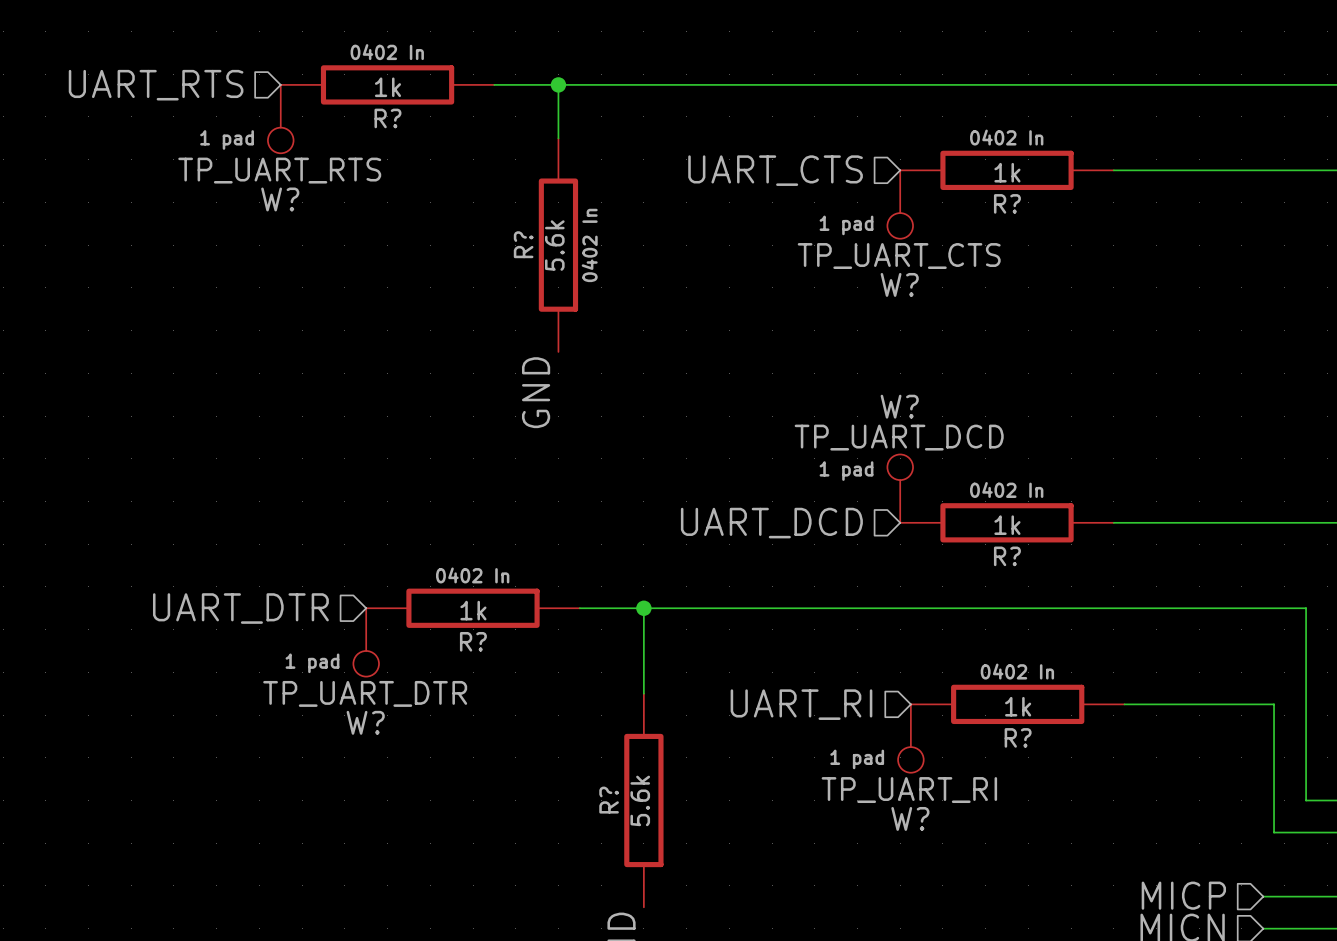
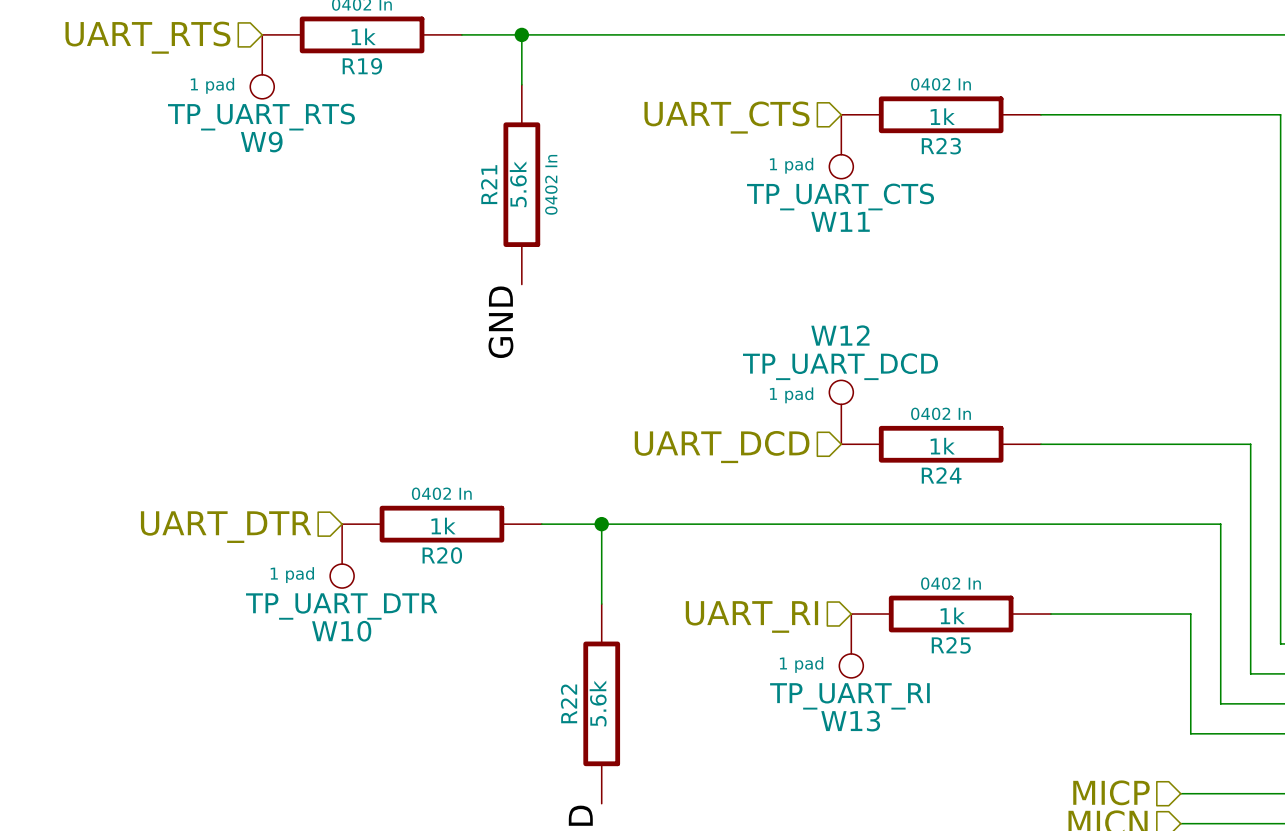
R? name: R? (387, 118) -> R19 (362, 66)
W? name: W? (280, 199) -> W9 (261, 142)
R? name: R? (1007, 203) -> R23 (941, 146)
R? name: R? (523, 244) -> R21 (489, 184)
W? name: W? (899, 284) -> W11 (840, 221)
W? name: W? (899, 406) -> W12 (840, 335)
R? name: R? (1007, 556) -> R24 (941, 475)
R? name: R? (473, 641) -> R20 (442, 555)
W? name: W? (365, 722) -> W10 (341, 631)
R? name: R? (1018, 737) -> R25 (951, 645)
R? name: R? (609, 800) -> R22 (569, 703)
W? name: W? (910, 818) -> W13 (850, 721)

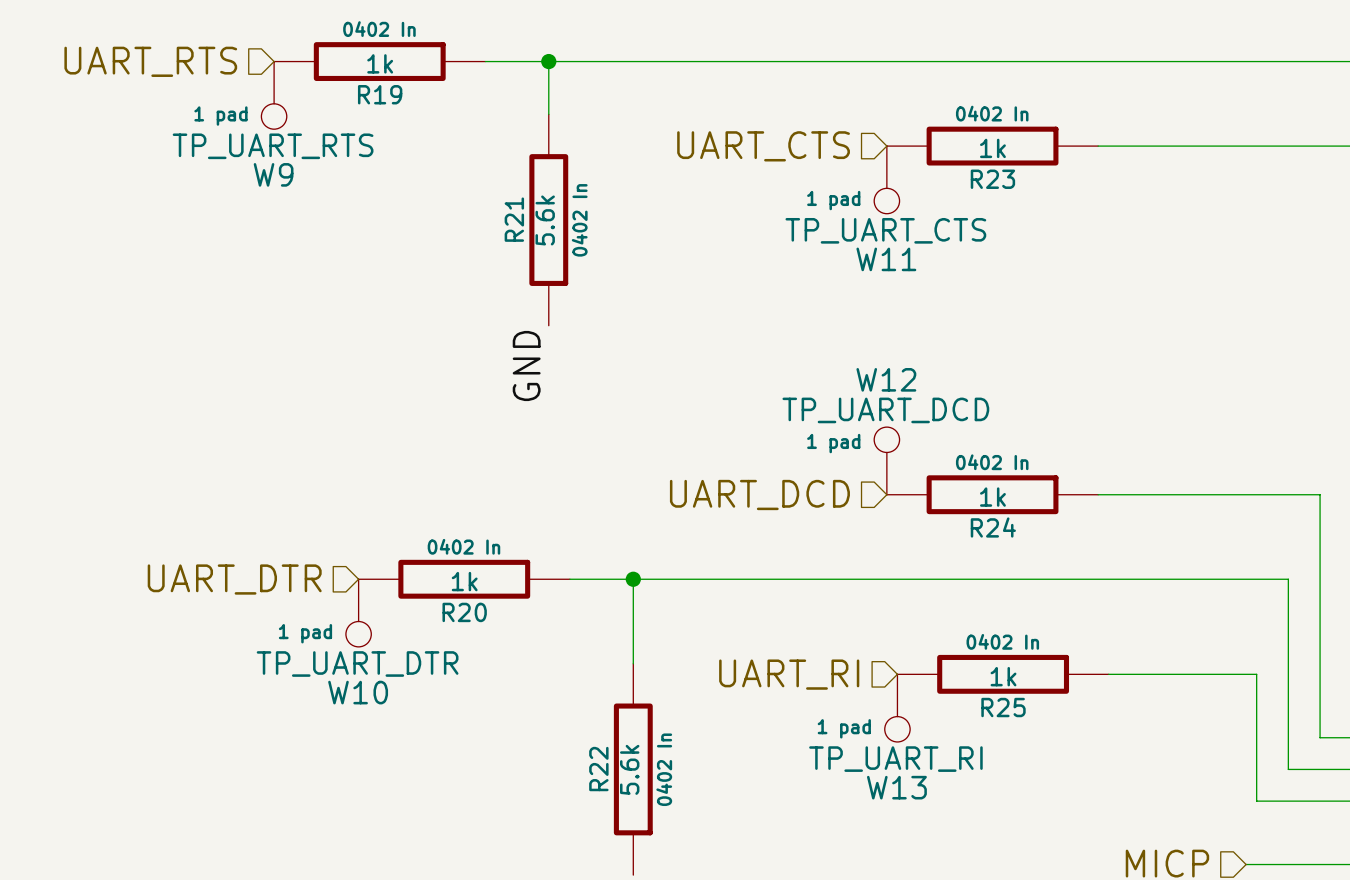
R22 text: none -> 0402 In (664, 769)

